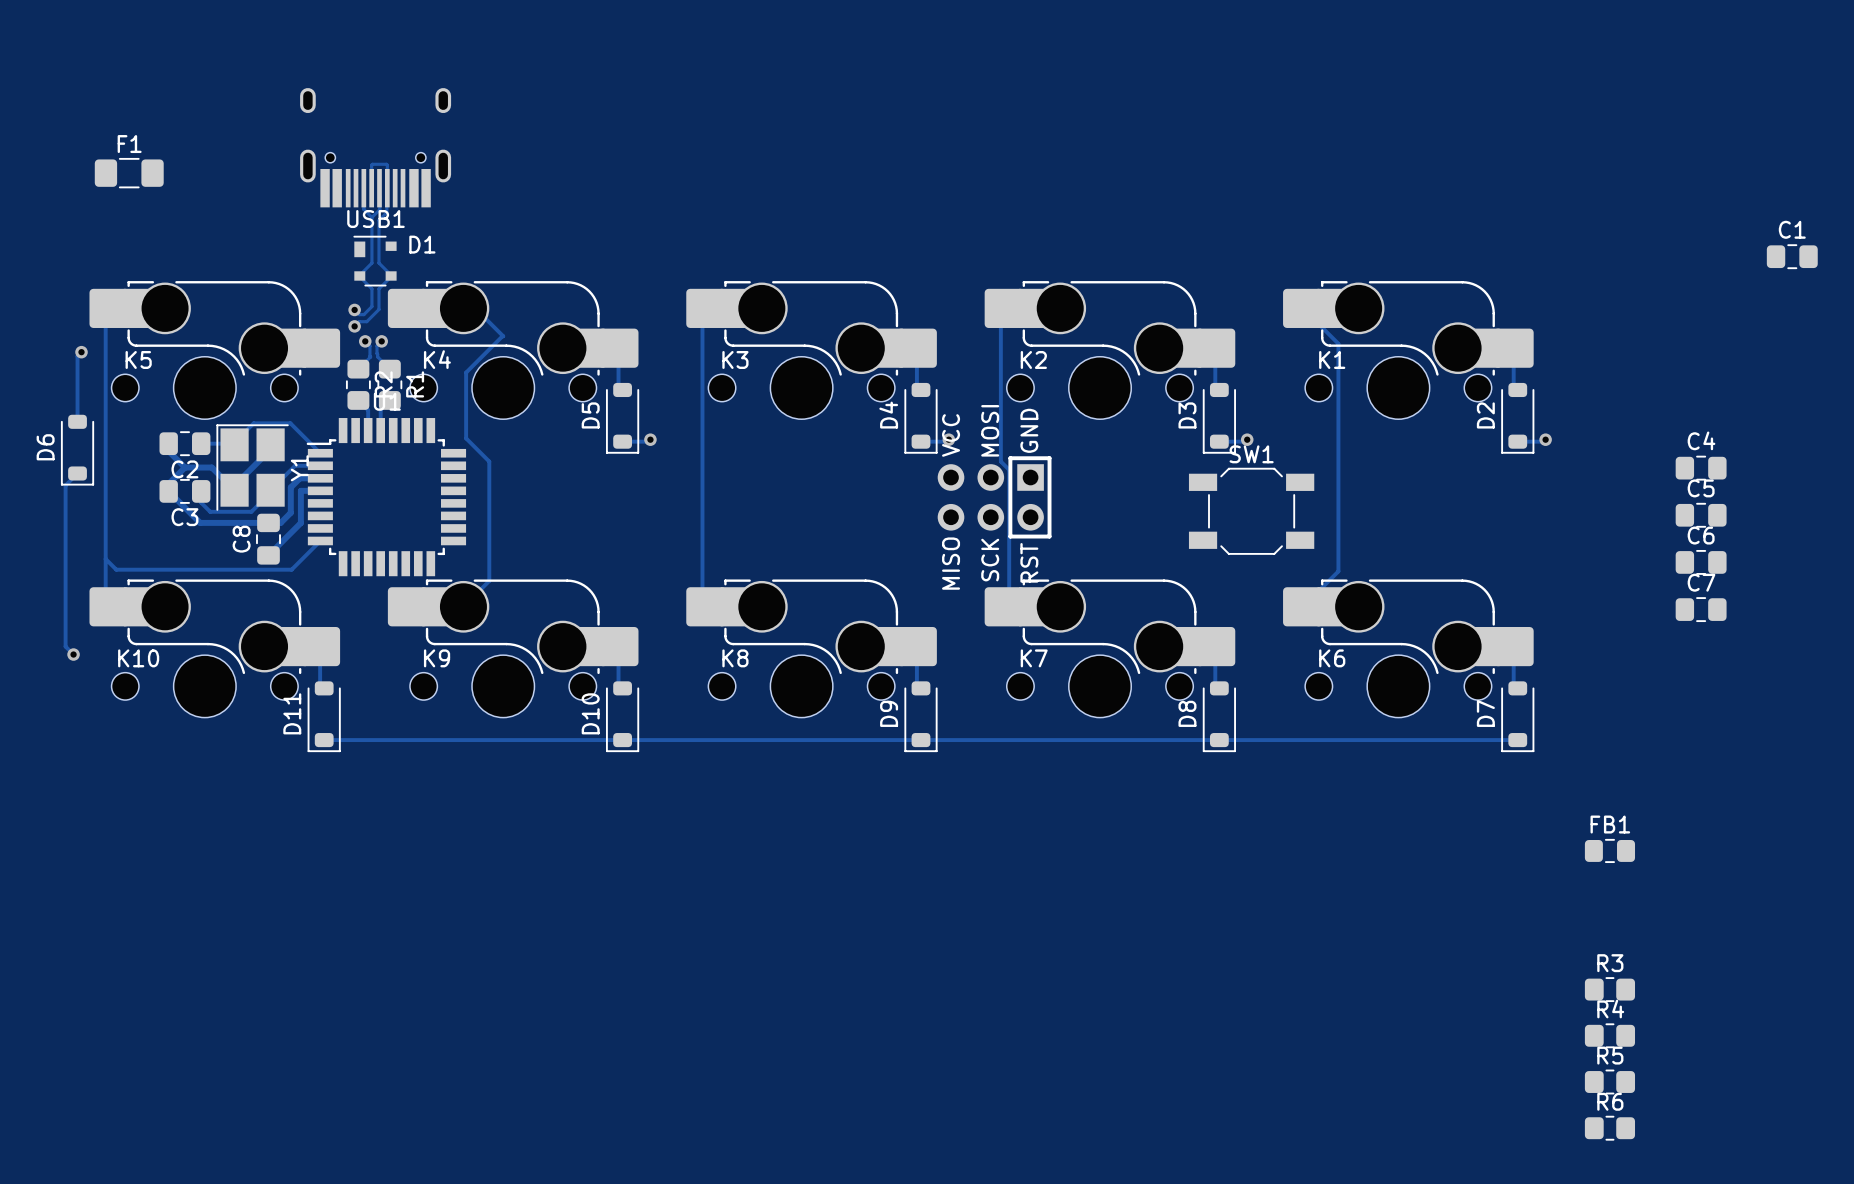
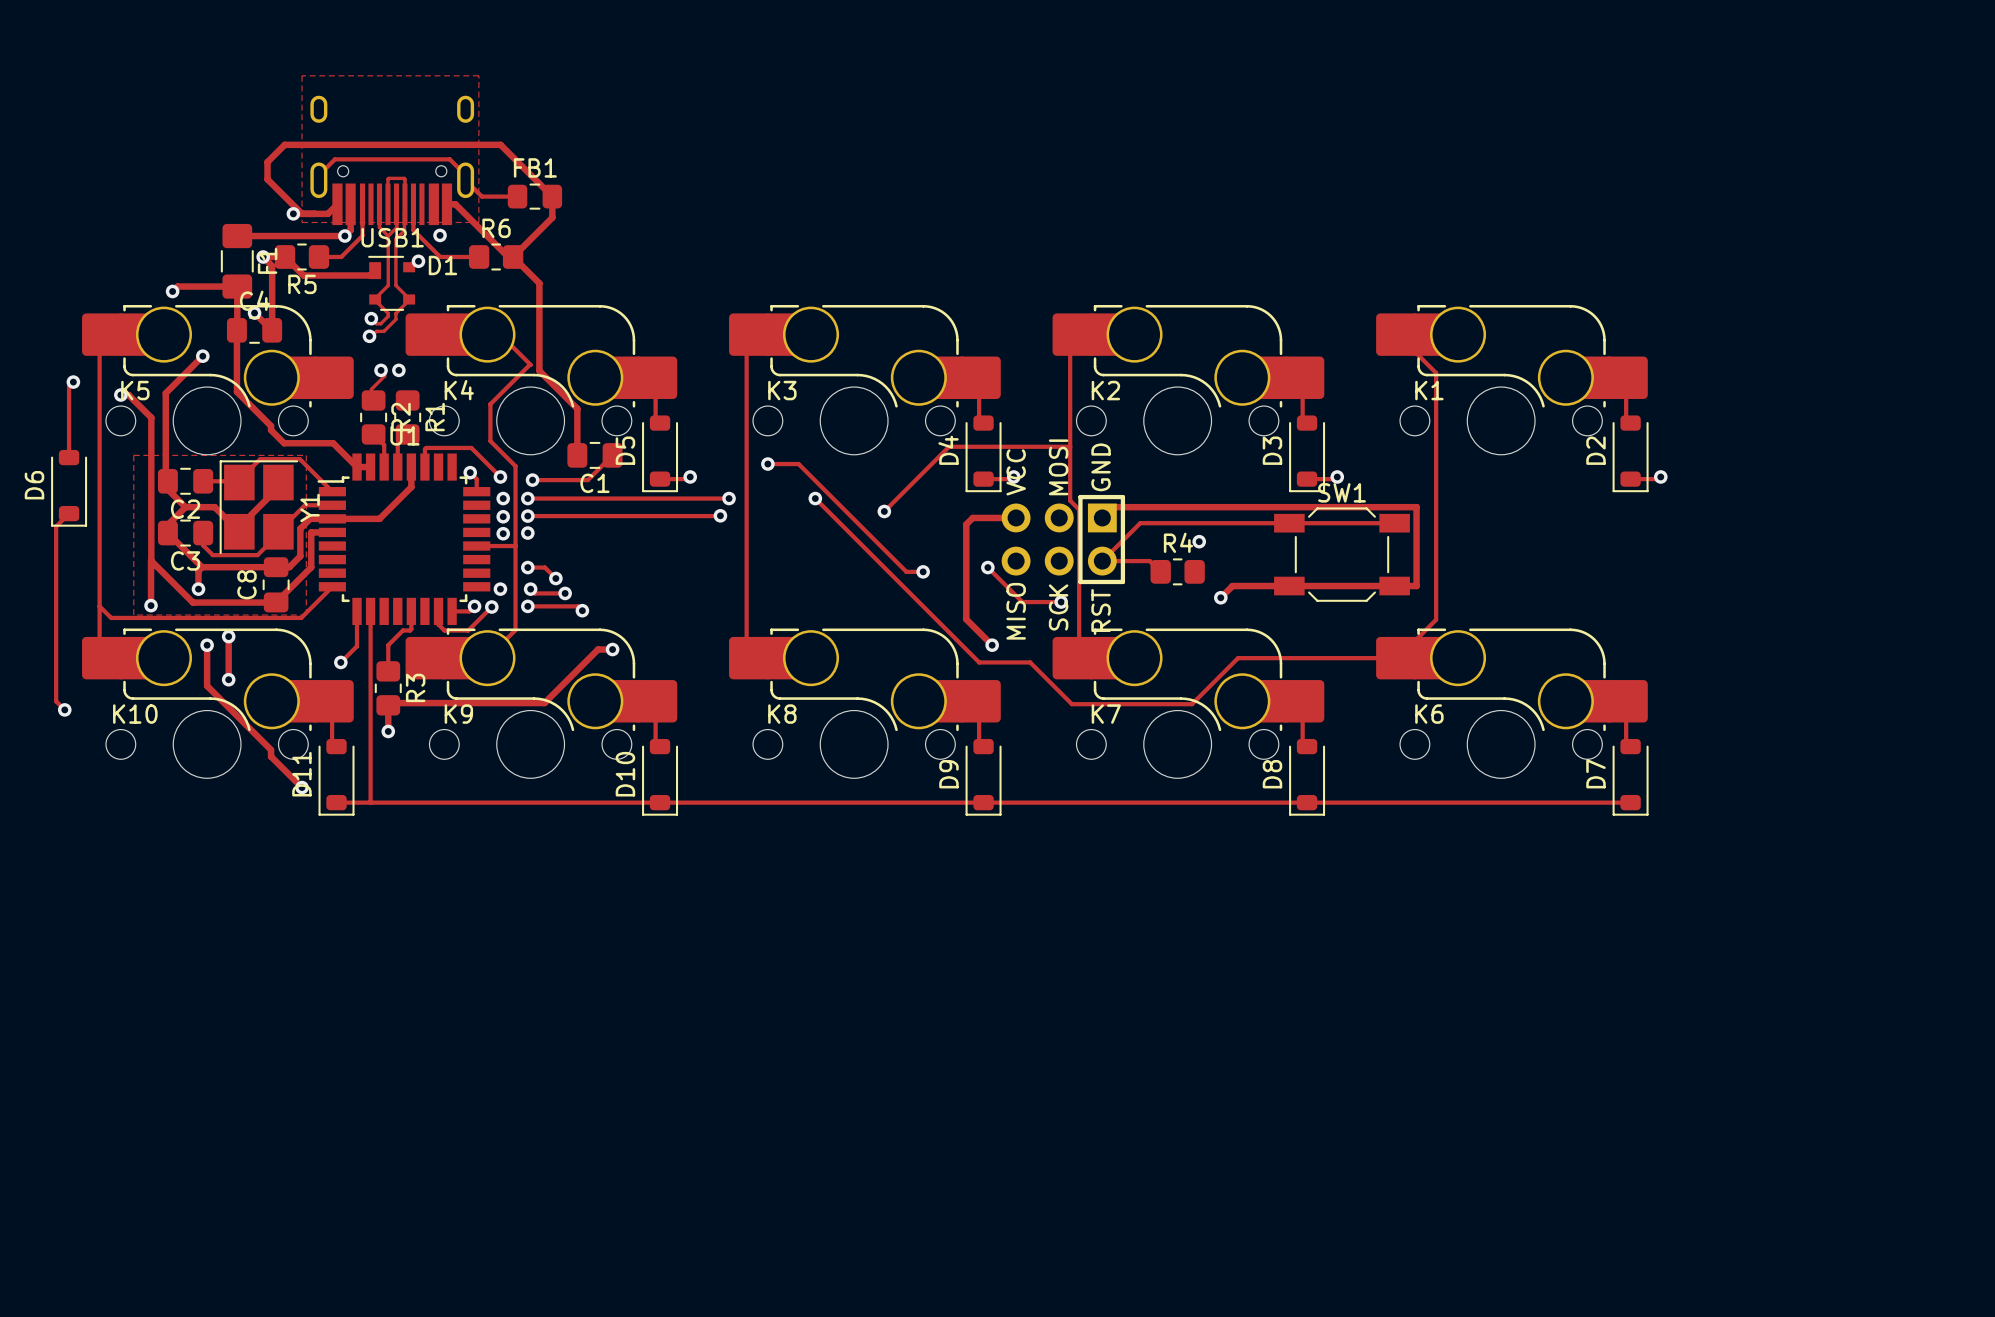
zone outline: none -> (302, 75) (302, 222) (478, 222) (478, 75) (302, 75)
track: none -> (318, 180) (318, 175) (334, 159) (449, 159) (465, 175) (465, 180) (481, 196) (517, 196)
F1 rotation: 0° (129, 173) -> 90° clockwise (237, 261)
F1 position: (129, 173) -> (237, 261)
track: none -> (337, 204) (327, 213) (293, 213)
track: none -> (350, 204) (350, 230) (344, 236) (237, 236)
track: none -> (362, 204) (362, 235) (341, 256) (318, 256)
track: none -> (413, 204) (413, 230) (440, 256) (479, 256)
track: none -> (447, 204) (455, 204) (508, 256) (513, 256)
via: none -> (293, 213)
track: none -> (302, 213) (267, 179) (267, 162) (284, 144) (500, 144) (552, 196) (552, 217) (513, 256)
via: none -> (440, 235)
via: none -> (344, 236)
C1 name position: C1 (1792, 229) -> C1 (594, 483)
via: none -> (263, 256)
track: none -> (513, 256) (539, 283) (539, 370) (577, 408) (577, 455)
via: none -> (418, 261)
track: none -> (375, 270) (370, 275) (303, 275) (285, 256) (263, 256) (272, 265) (272, 330) (254, 313)
C1 position: (1792, 256) -> (594, 455)
track: none -> (172, 291) (177, 286) (237, 286) (236, 391) (271, 426) (271, 430) (284, 443) (333, 443) (357, 467) (370, 467)
via: none -> (172, 291)
via: none -> (254, 313)
track: (371, 291) (371, 306) (363, 314) (359, 314) (354, 309) -> (388, 316) (380, 323) (376, 323) (371, 318)
track: (378, 294) (378, 309) (366, 321) (359, 321) (354, 326) -> (395, 319) (383, 331) (376, 331) (371, 336)
via position: (354, 326) -> (371, 318)
track: none -> (202, 356) (165, 393) (165, 479) (167, 481)
via: none -> (202, 356)
track: none -> (379, 366) (384, 372) (384, 376) (371, 390)
track: (365, 341) (369, 346) (370, 356) (358, 369) -> none
track: (381, 341) (377, 346) (377, 356) (389, 369) -> none
track: none -> (120, 395) (128, 395) (151, 417) (151, 560)
via: none -> (120, 395)
track: (466, 406) (466, 438) (489, 461) -> (490, 441) (515, 466) (515, 500)
track: none -> (1070, 446) (949, 446) (884, 511)
zone outline: none -> (133, 455) (133, 615) (306, 615) (306, 455) (133, 455)
track: none -> (612, 455) (587, 480) (532, 480)
track: none -> (767, 464) (798, 464) (906, 571) (923, 571)
via: none -> (767, 464)
track: none -> (411, 467) (411, 487) (379, 518) (332, 518)
track: none -> (424, 467) (426, 447) (471, 447) (500, 476)
track: none -> (470, 472) (476, 479) (476, 491)
via: none -> (470, 472)
via: none -> (500, 476)
via: none -> (532, 480)
via: none -> (503, 498)
track: none -> (527, 498) (729, 498)
via: none -> (527, 498)
via: none -> (729, 498)
track: none -> (815, 498) (979, 662) (1030, 662) (1071, 704) (1192, 704) (1238, 658) (1397, 658)
via: none -> (815, 498)
C4 position: (1701, 468) -> (254, 330)
via: none -> (884, 511)
via: none -> (527, 516)
track: none -> (720, 515) (527, 516)
via: none -> (720, 515)
via: none -> (503, 516)
track: none -> (1016, 517) (972, 517) (966, 524) (966, 619) (992, 645)
track: none -> (1102, 517) (1113, 507) (1416, 507) (1416, 585)
track: none -> (1394, 523) (1140, 523) (1102, 561) (1149, 561) (1160, 571)
via: none -> (527, 533)
via: none -> (503, 533)
via: none -> (1199, 541)
track: none -> (476, 546) (515, 546)
C5: (1701, 515) -> none
track: none -> (151, 560) (151, 605)
track: none -> (151, 560) (192, 602) (276, 602)
track: none -> (202, 567) (198, 570) (198, 589)
track: none -> (527, 567) (544, 567) (555, 578)
via: none -> (527, 567)
track: none -> (987, 567) (1022, 602) (1061, 602)
via: none -> (987, 567)
via: none -> (923, 571)
via: none -> (555, 578)
track: none -> (1416, 586) (1232, 586) (1220, 597)
via: none -> (198, 589)
via: none -> (500, 589)
track: none -> (530, 589) (534, 593) (565, 593)
via: none -> (530, 589)
via: none -> (565, 593)
via: none -> (1220, 597)
via: none -> (1061, 602)
via: none -> (151, 605)
track: none -> (474, 606) (469, 611) (452, 611)
via: none -> (474, 606)
track: none -> (491, 607) (468, 630) (444, 630) (438, 624) (438, 611)
via: none -> (491, 607)
track: none -> (527, 606) (578, 606) (582, 610)
via: none -> (527, 606)
C6: (1701, 562) -> none
track: none -> (357, 611) (357, 646) (340, 662)
track: none -> (370, 611) (371, 802)
track: none -> (411, 611) (411, 629) (402, 630) (388, 645) (388, 671)
via: none -> (582, 610)
track: none -> (228, 636) (228, 679)
via: none -> (228, 636)
track: none -> (207, 645) (207, 685) (271, 749) (271, 756) (302, 787)
via: none -> (207, 645)
via: none -> (992, 645)
track: none -> (612, 649) (598, 649) (544, 703) (390, 703) (388, 705) (388, 731)
via: none -> (612, 649)
C7: (1701, 609) -> none
via: none -> (340, 662)
via: none -> (228, 679)
via: none -> (388, 731)
via: none -> (302, 787)
FB1 position: (1609, 850) -> (534, 196)
R3 rotation: 0° (1609, 989) -> 90° clockwise (388, 688)
R3 position: (1609, 989) -> (388, 688)
R4 position: (1609, 1035) -> (1177, 571)
R5 name position: R5 (1610, 1055) -> R5 (302, 284)
R5 position: (1609, 1082) -> (302, 256)
R6 position: (1609, 1128) -> (496, 256)

